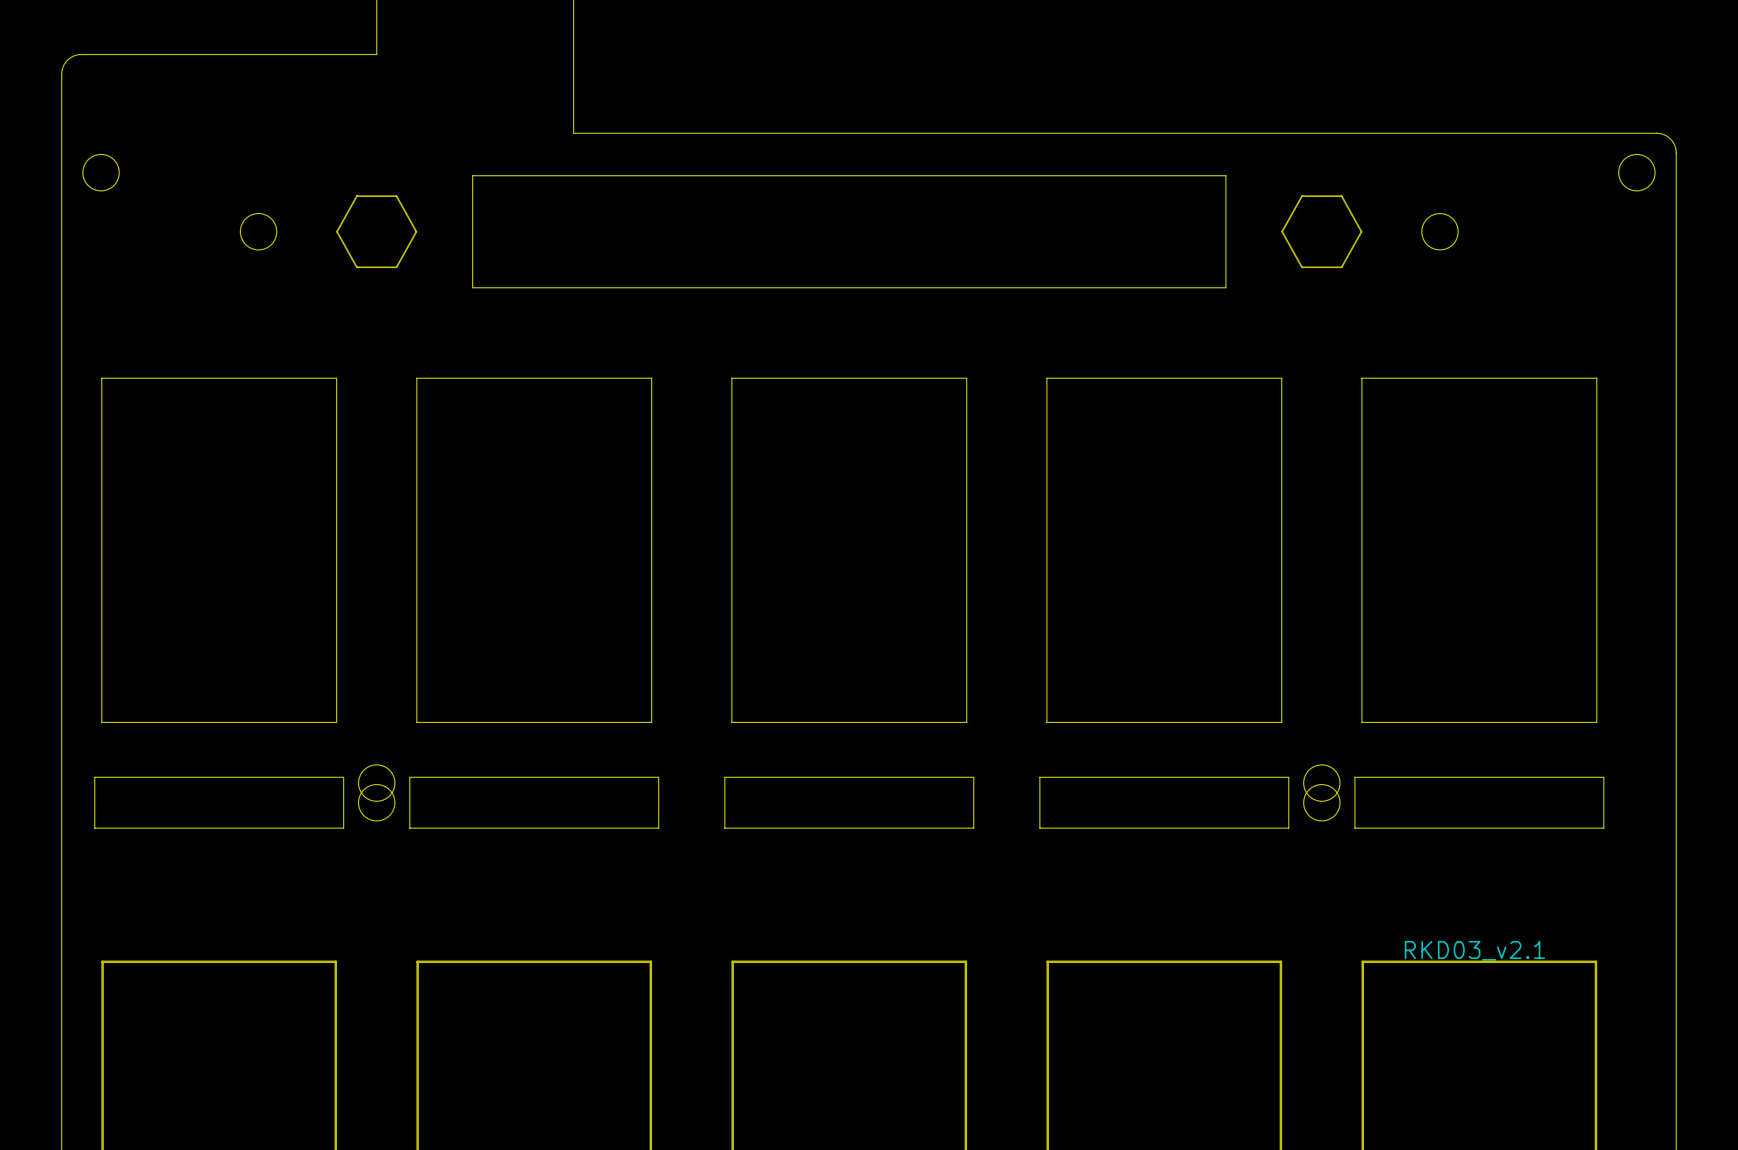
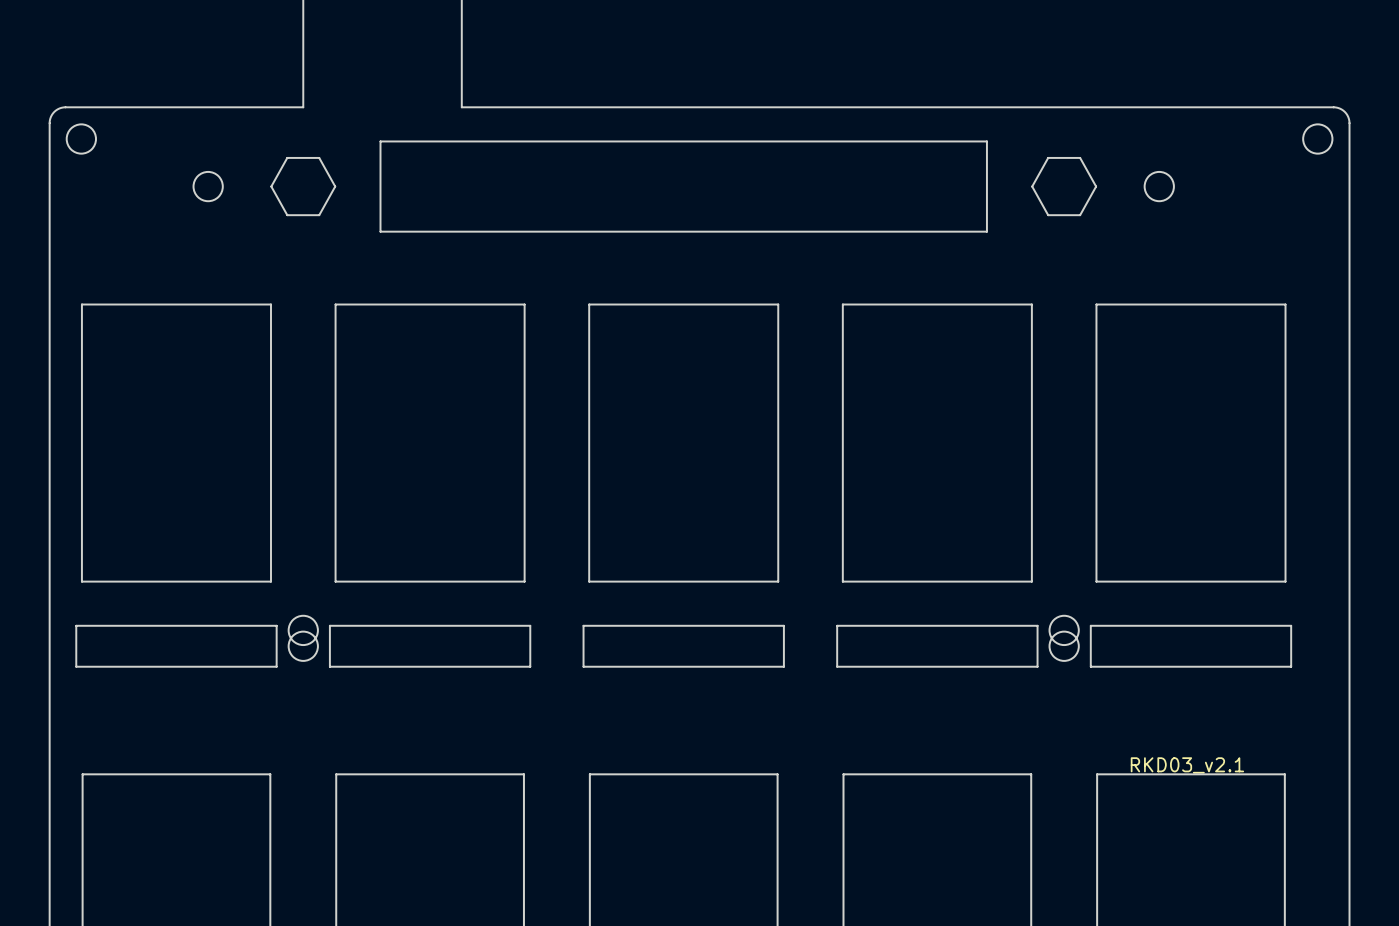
board edge: (376, 54) (74, 55) (65, 61) (61, 72) (61, 152) -> (303, 43) (303, 107) (65, 107) (54, 111) (49, 123)

